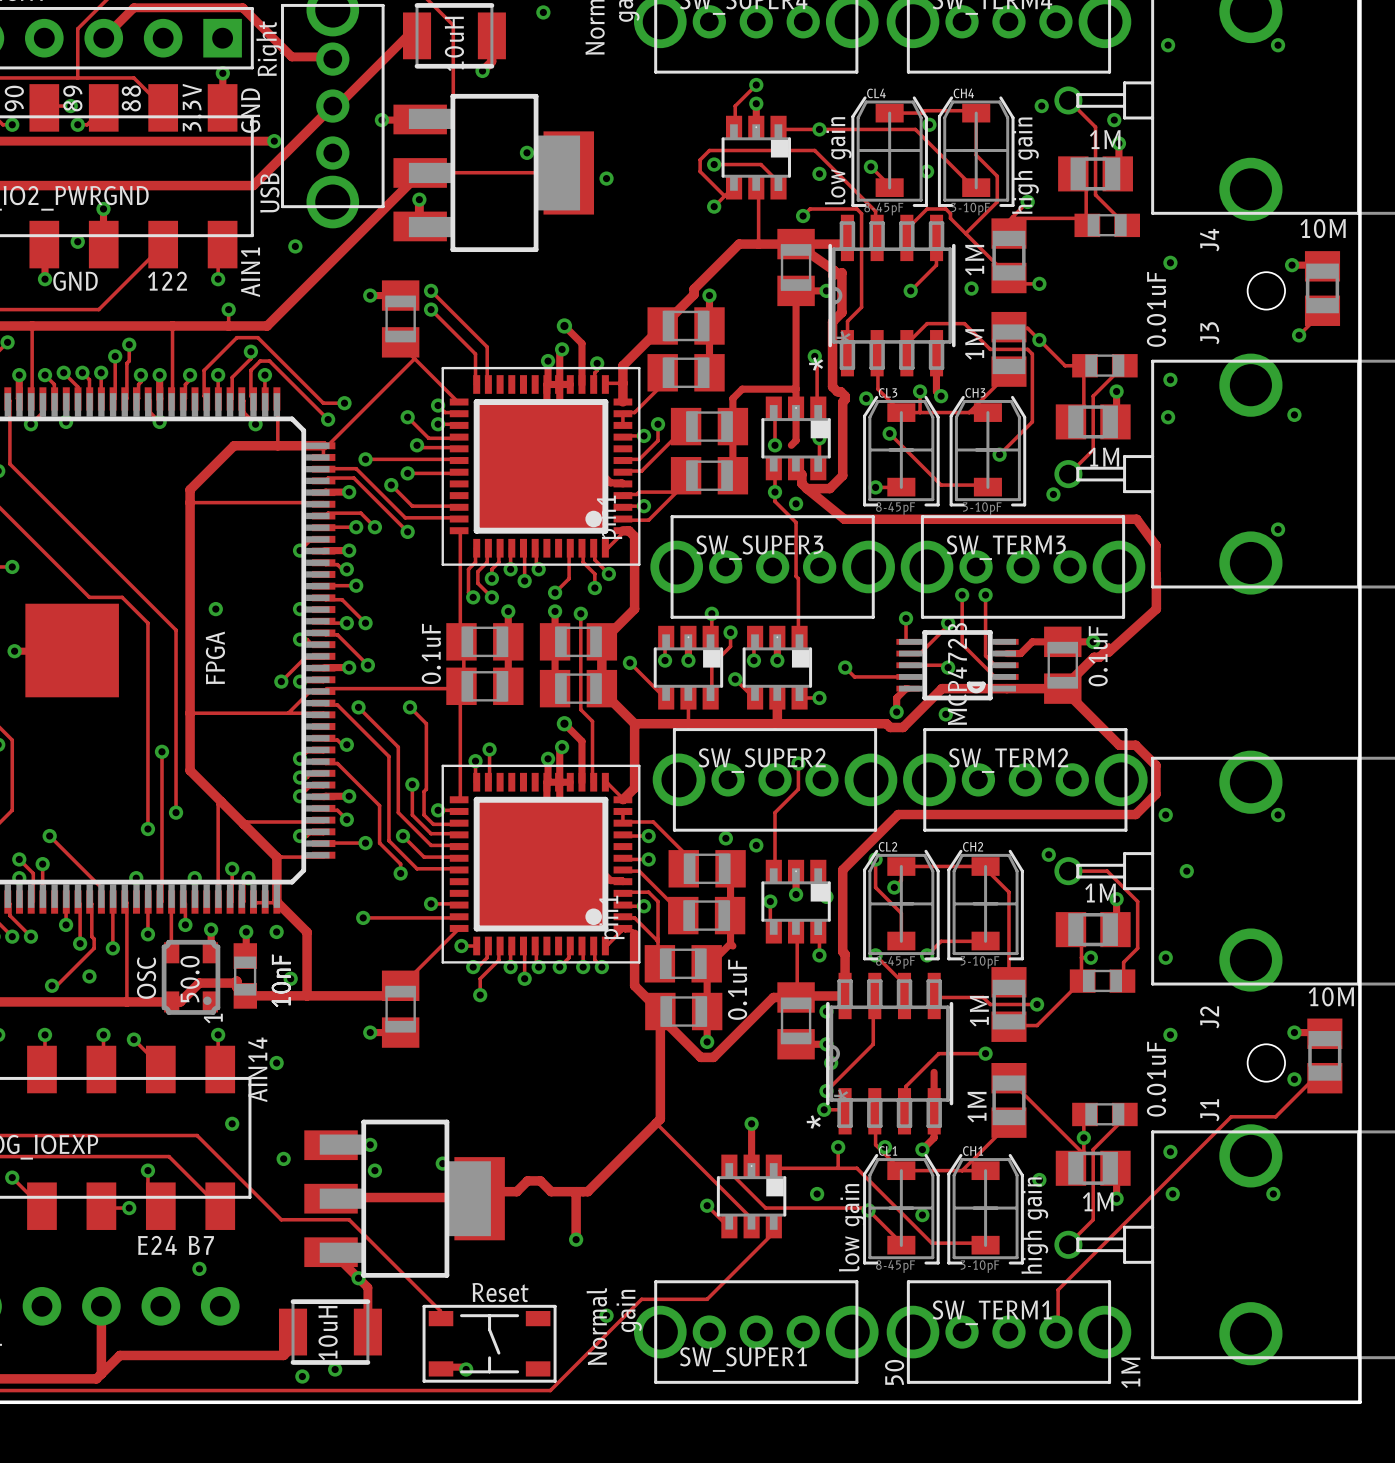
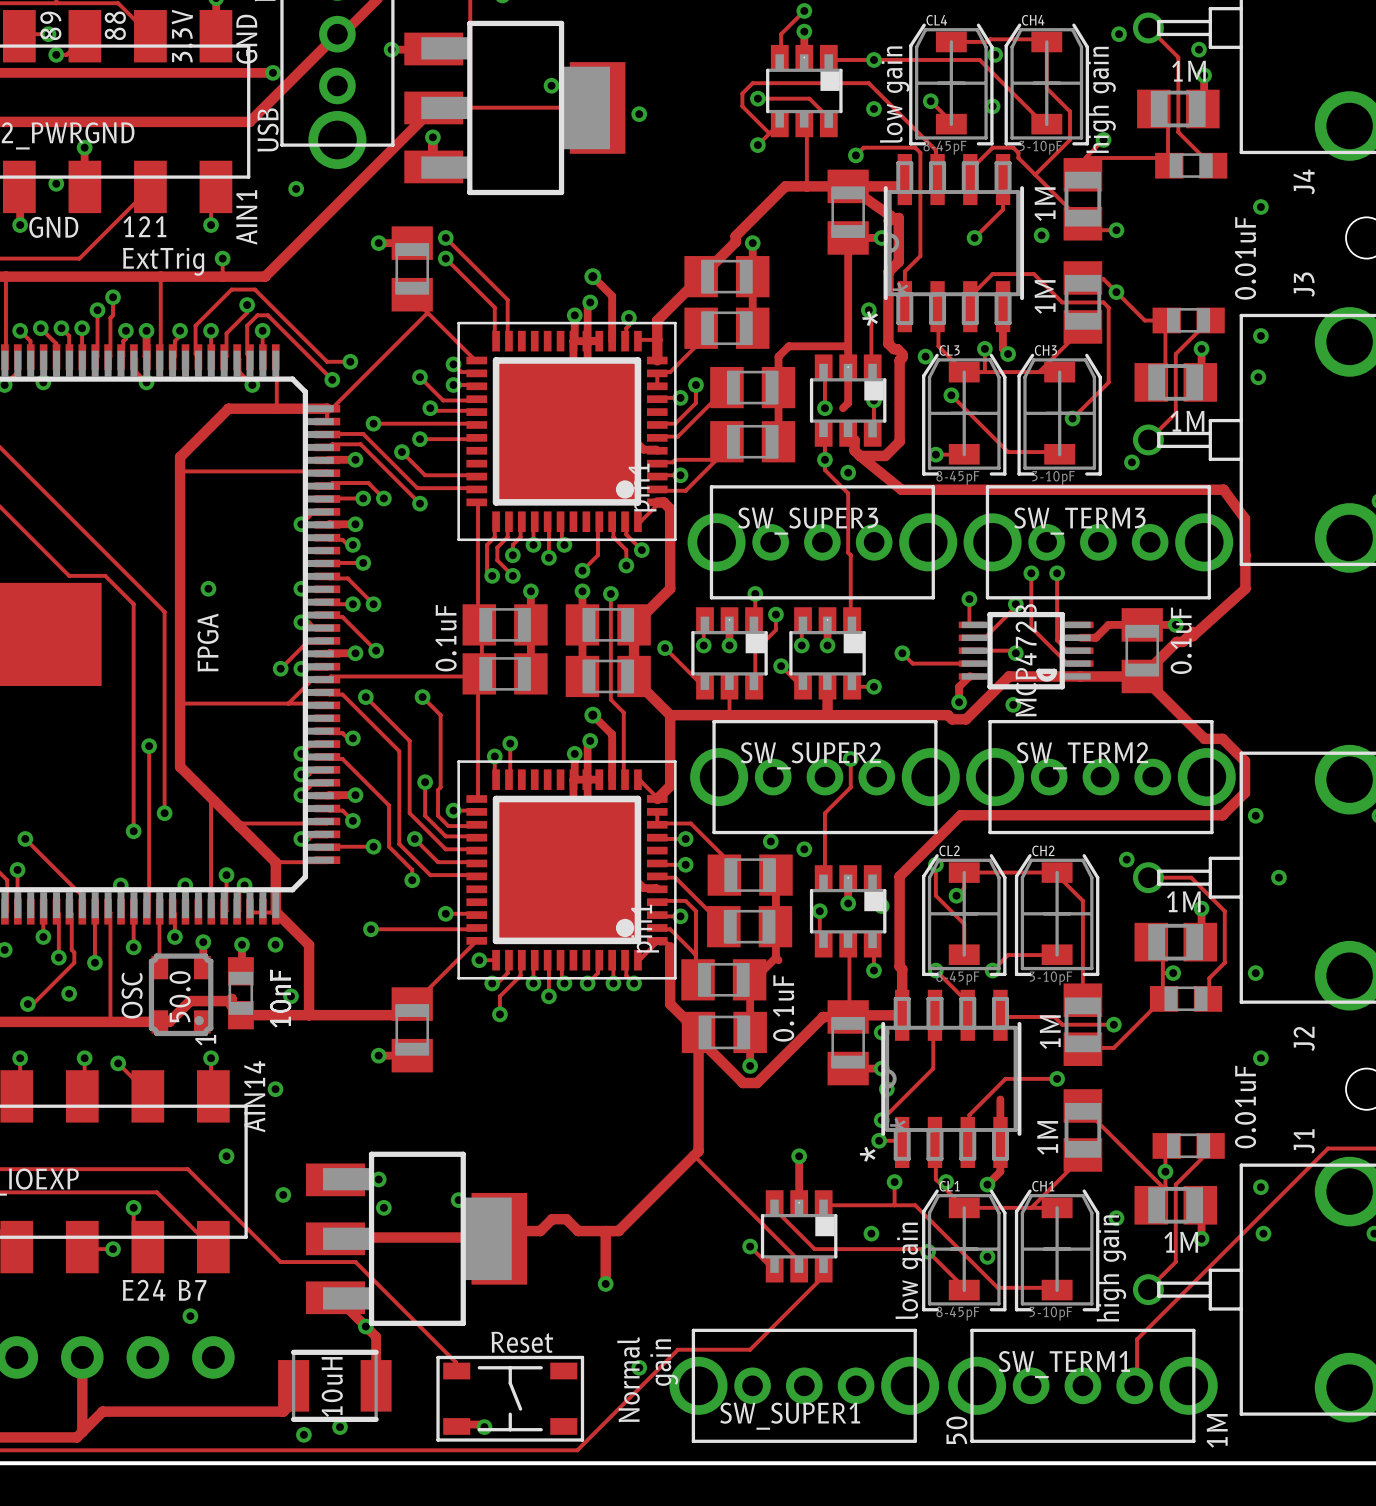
text: 122 (167, 281) -> 121 (144, 226)
text: none -> ExtTrig (163, 261)

